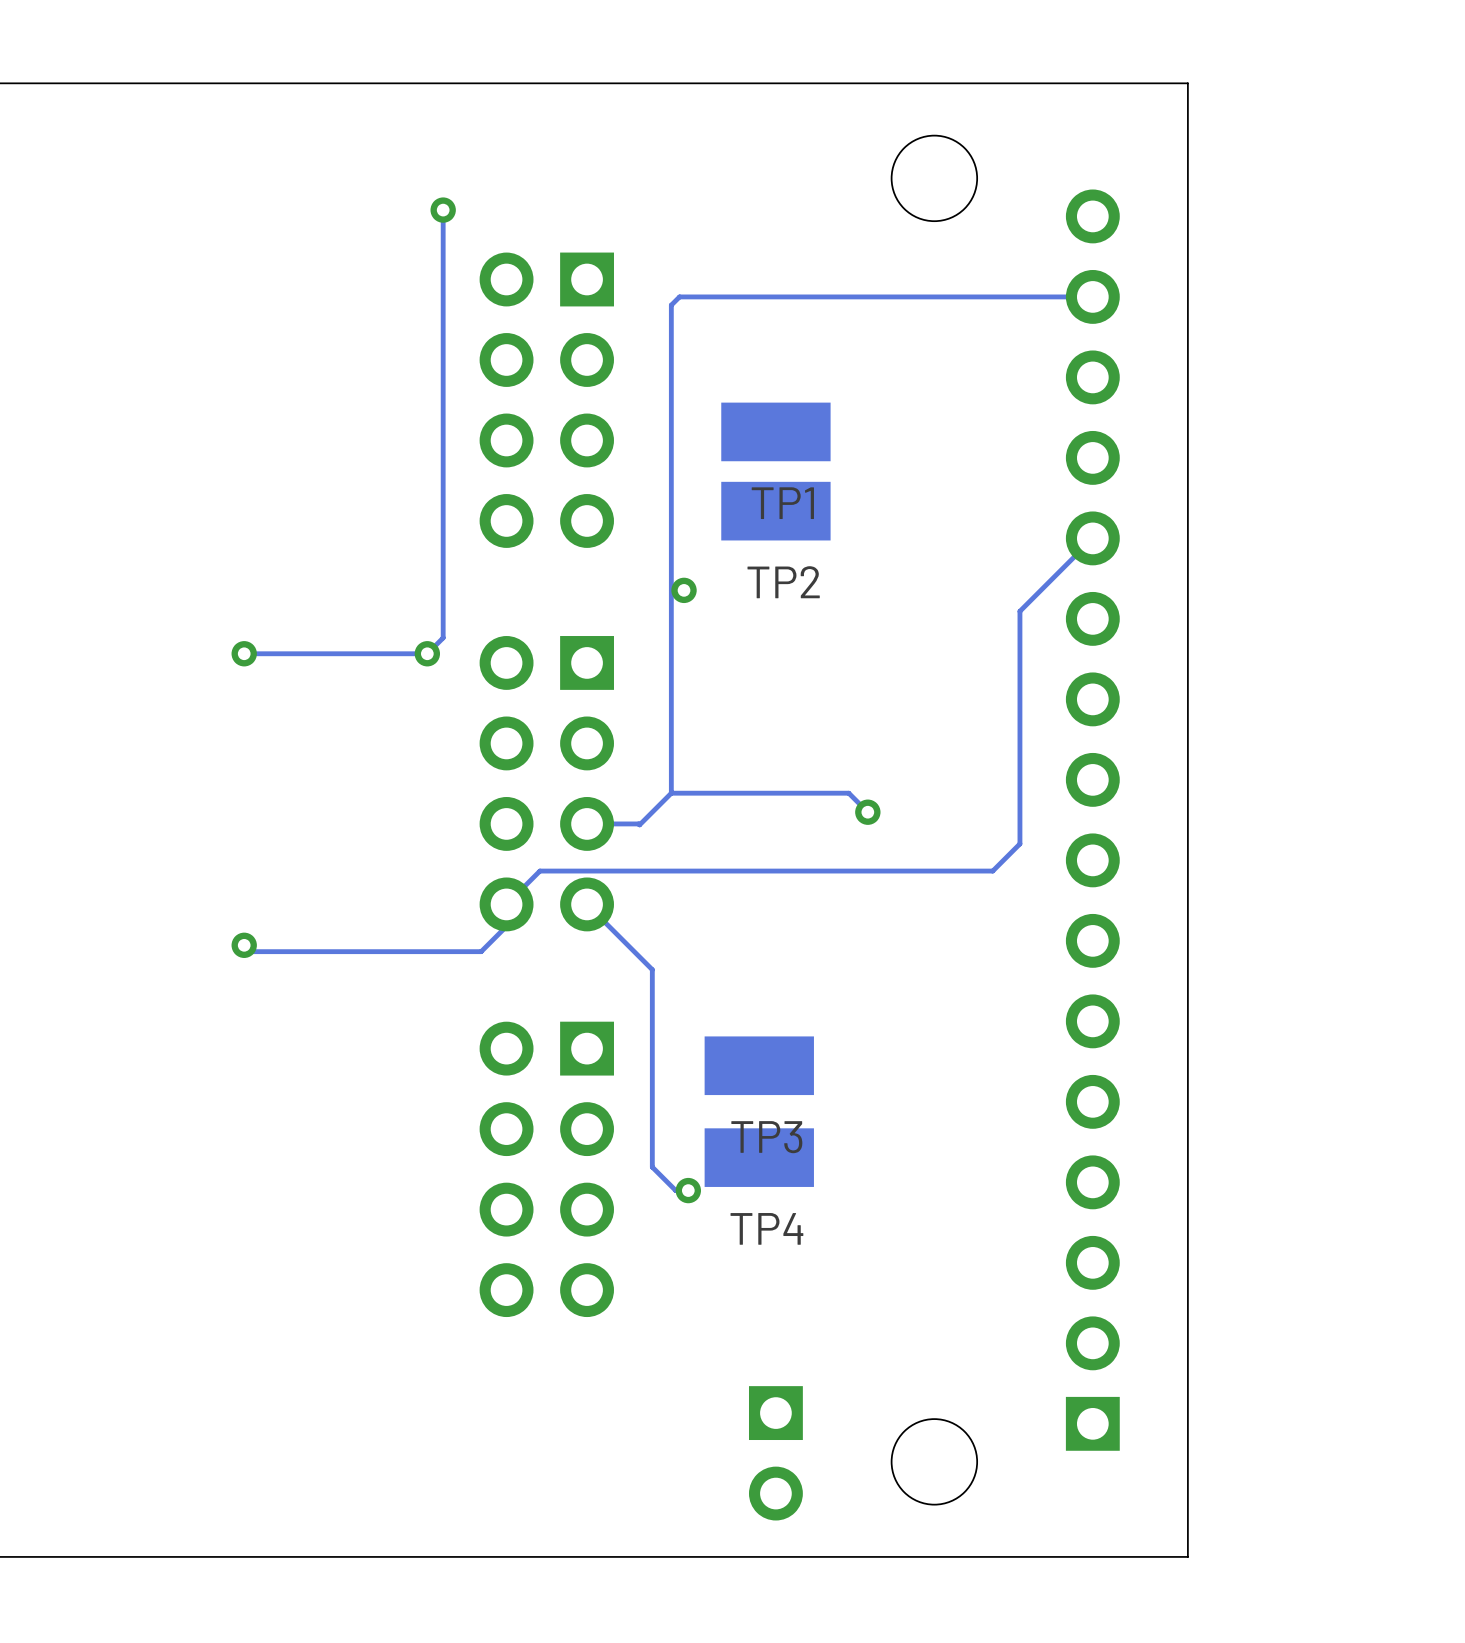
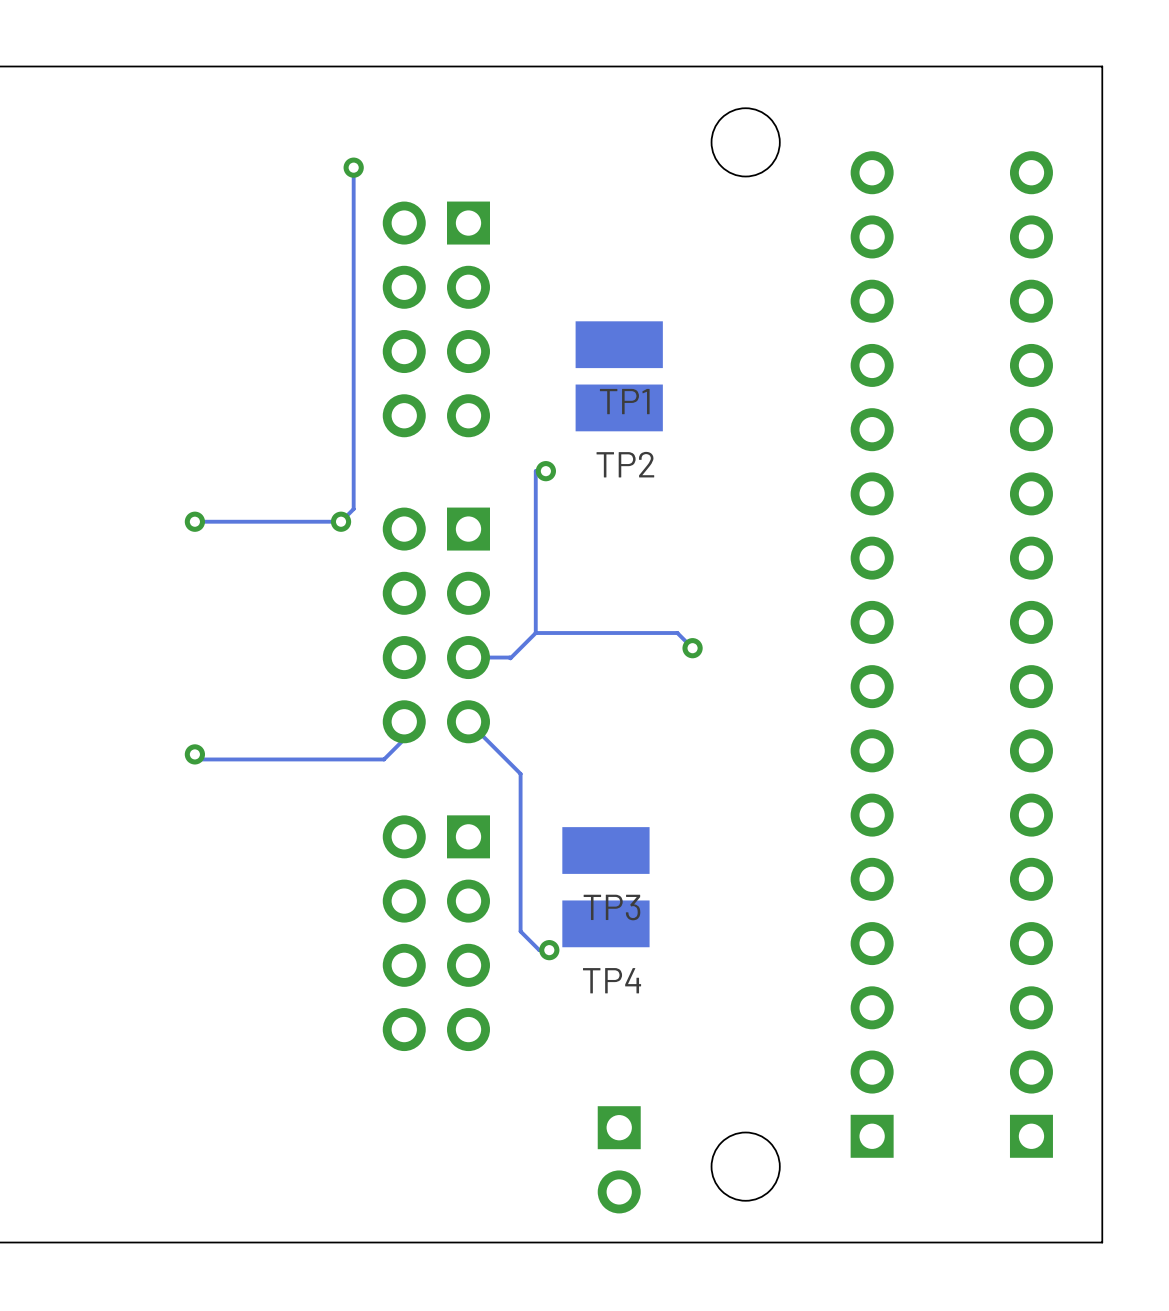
board edge: (1187, 83) (1187, 1556) -> (948, 66) (1102, 66) (1102, 1242) (948, 1242)
track: (1092, 296) (679, 296) (671, 305) (671, 590) -> none
track: (1092, 538) (1019, 611) (1019, 843) (992, 871) (539, 871) (506, 904) -> none
part: none -> (1031, 654)

